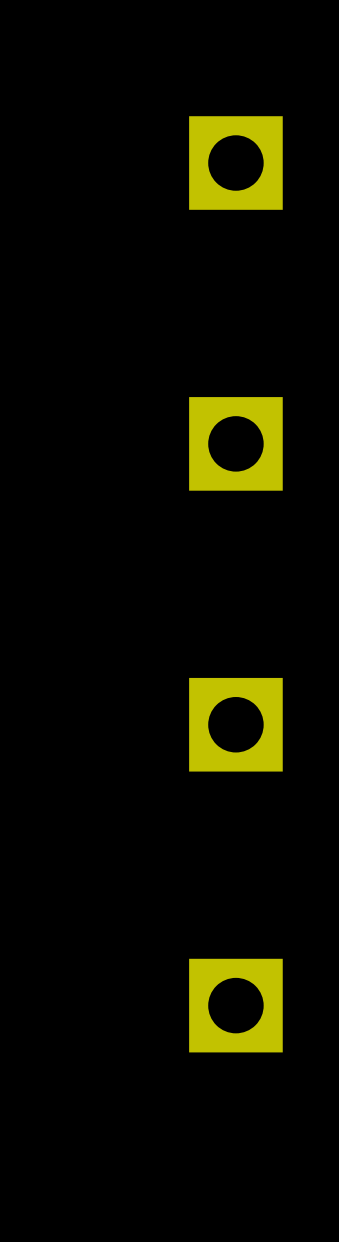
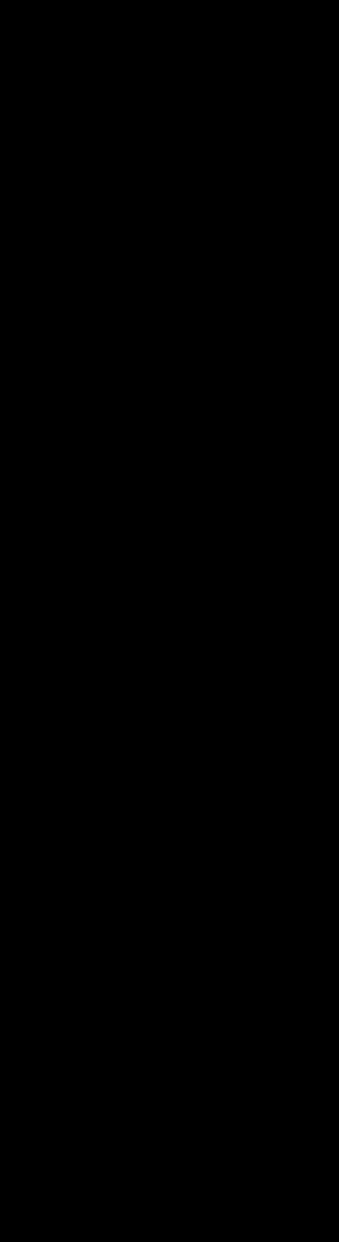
part: (235, 163) -> none
part: (235, 443) -> none
part: (235, 724) -> none
part: (235, 1005) -> none

